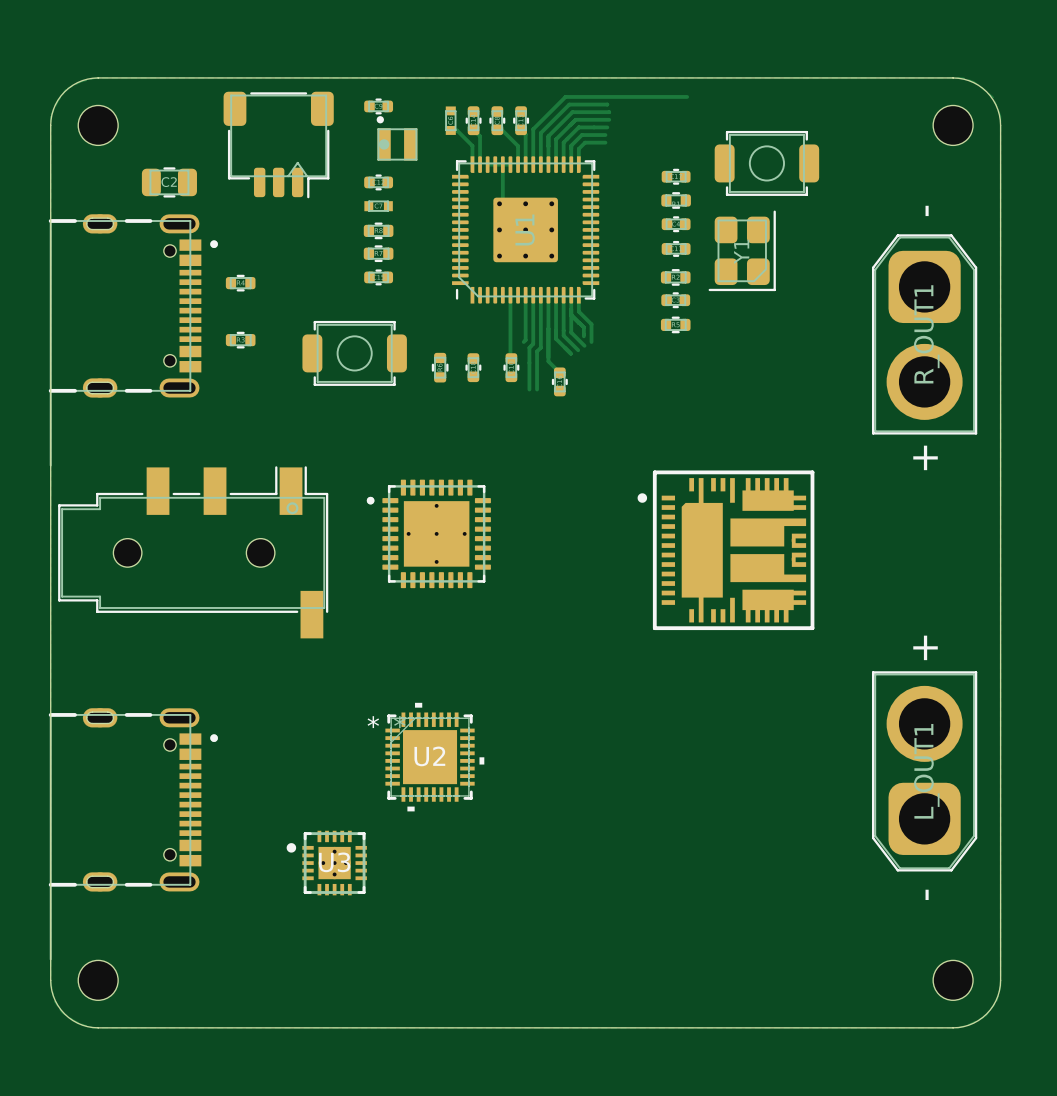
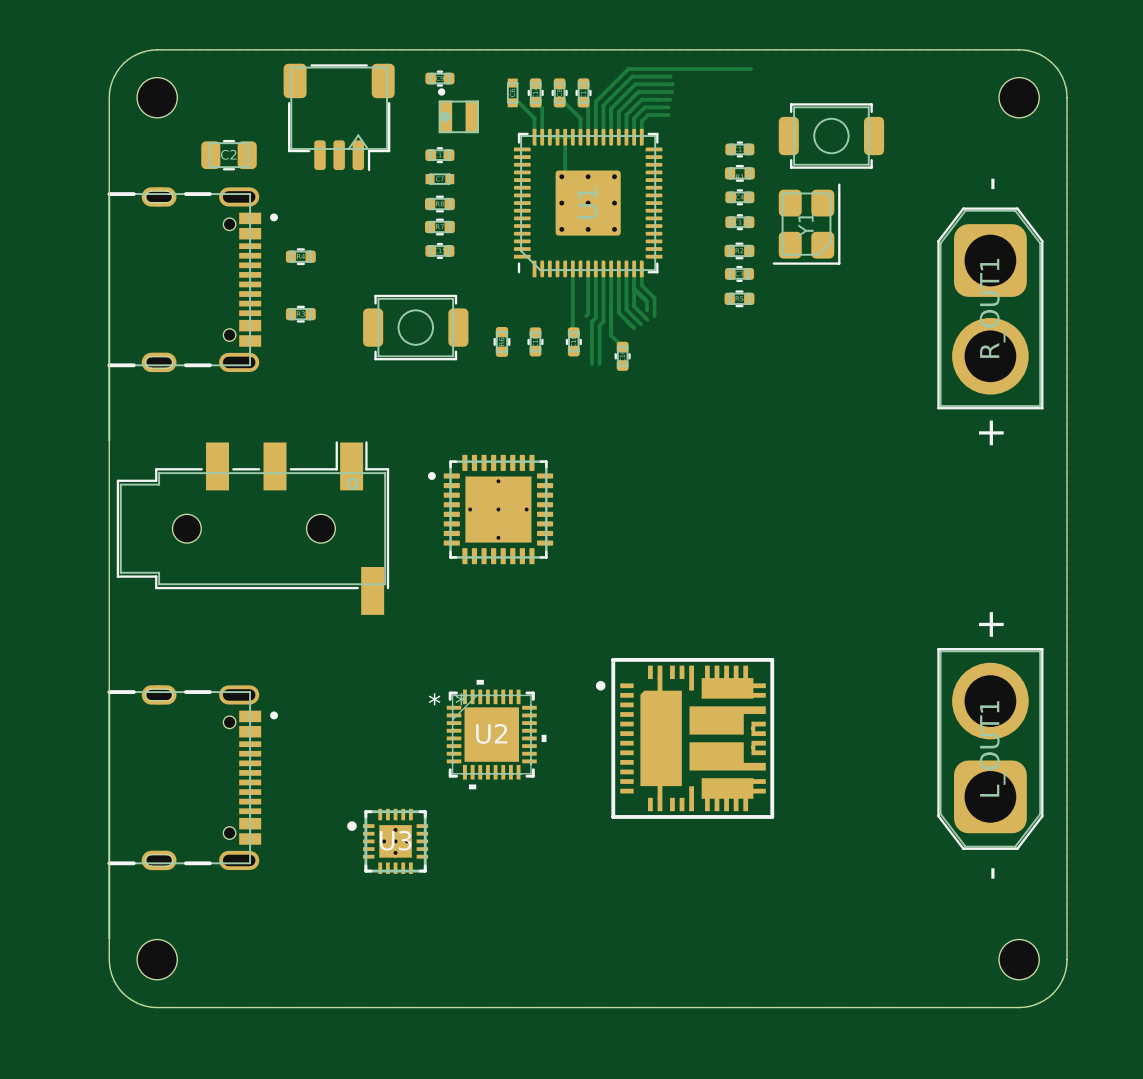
part position: (725, 550) -> (685, 738)

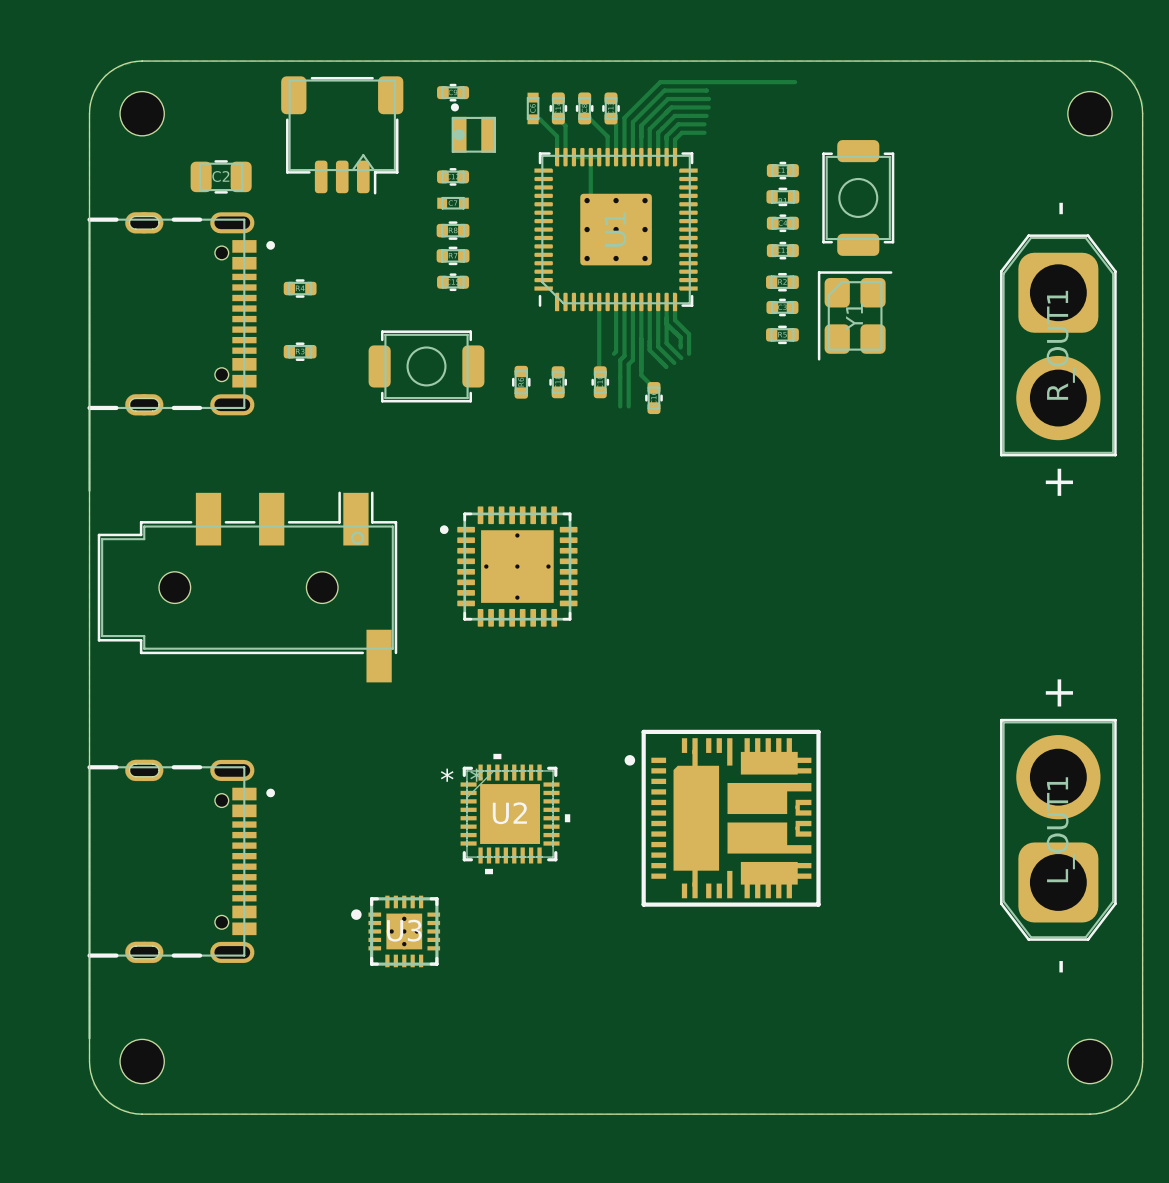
part rotation: 0° (831, 136) -> 90° clockwise (858, 197)
Y1 rotation: 0° (806, 224) -> 180° (855, 315)
Y1 position: (806, 224) -> (855, 315)

